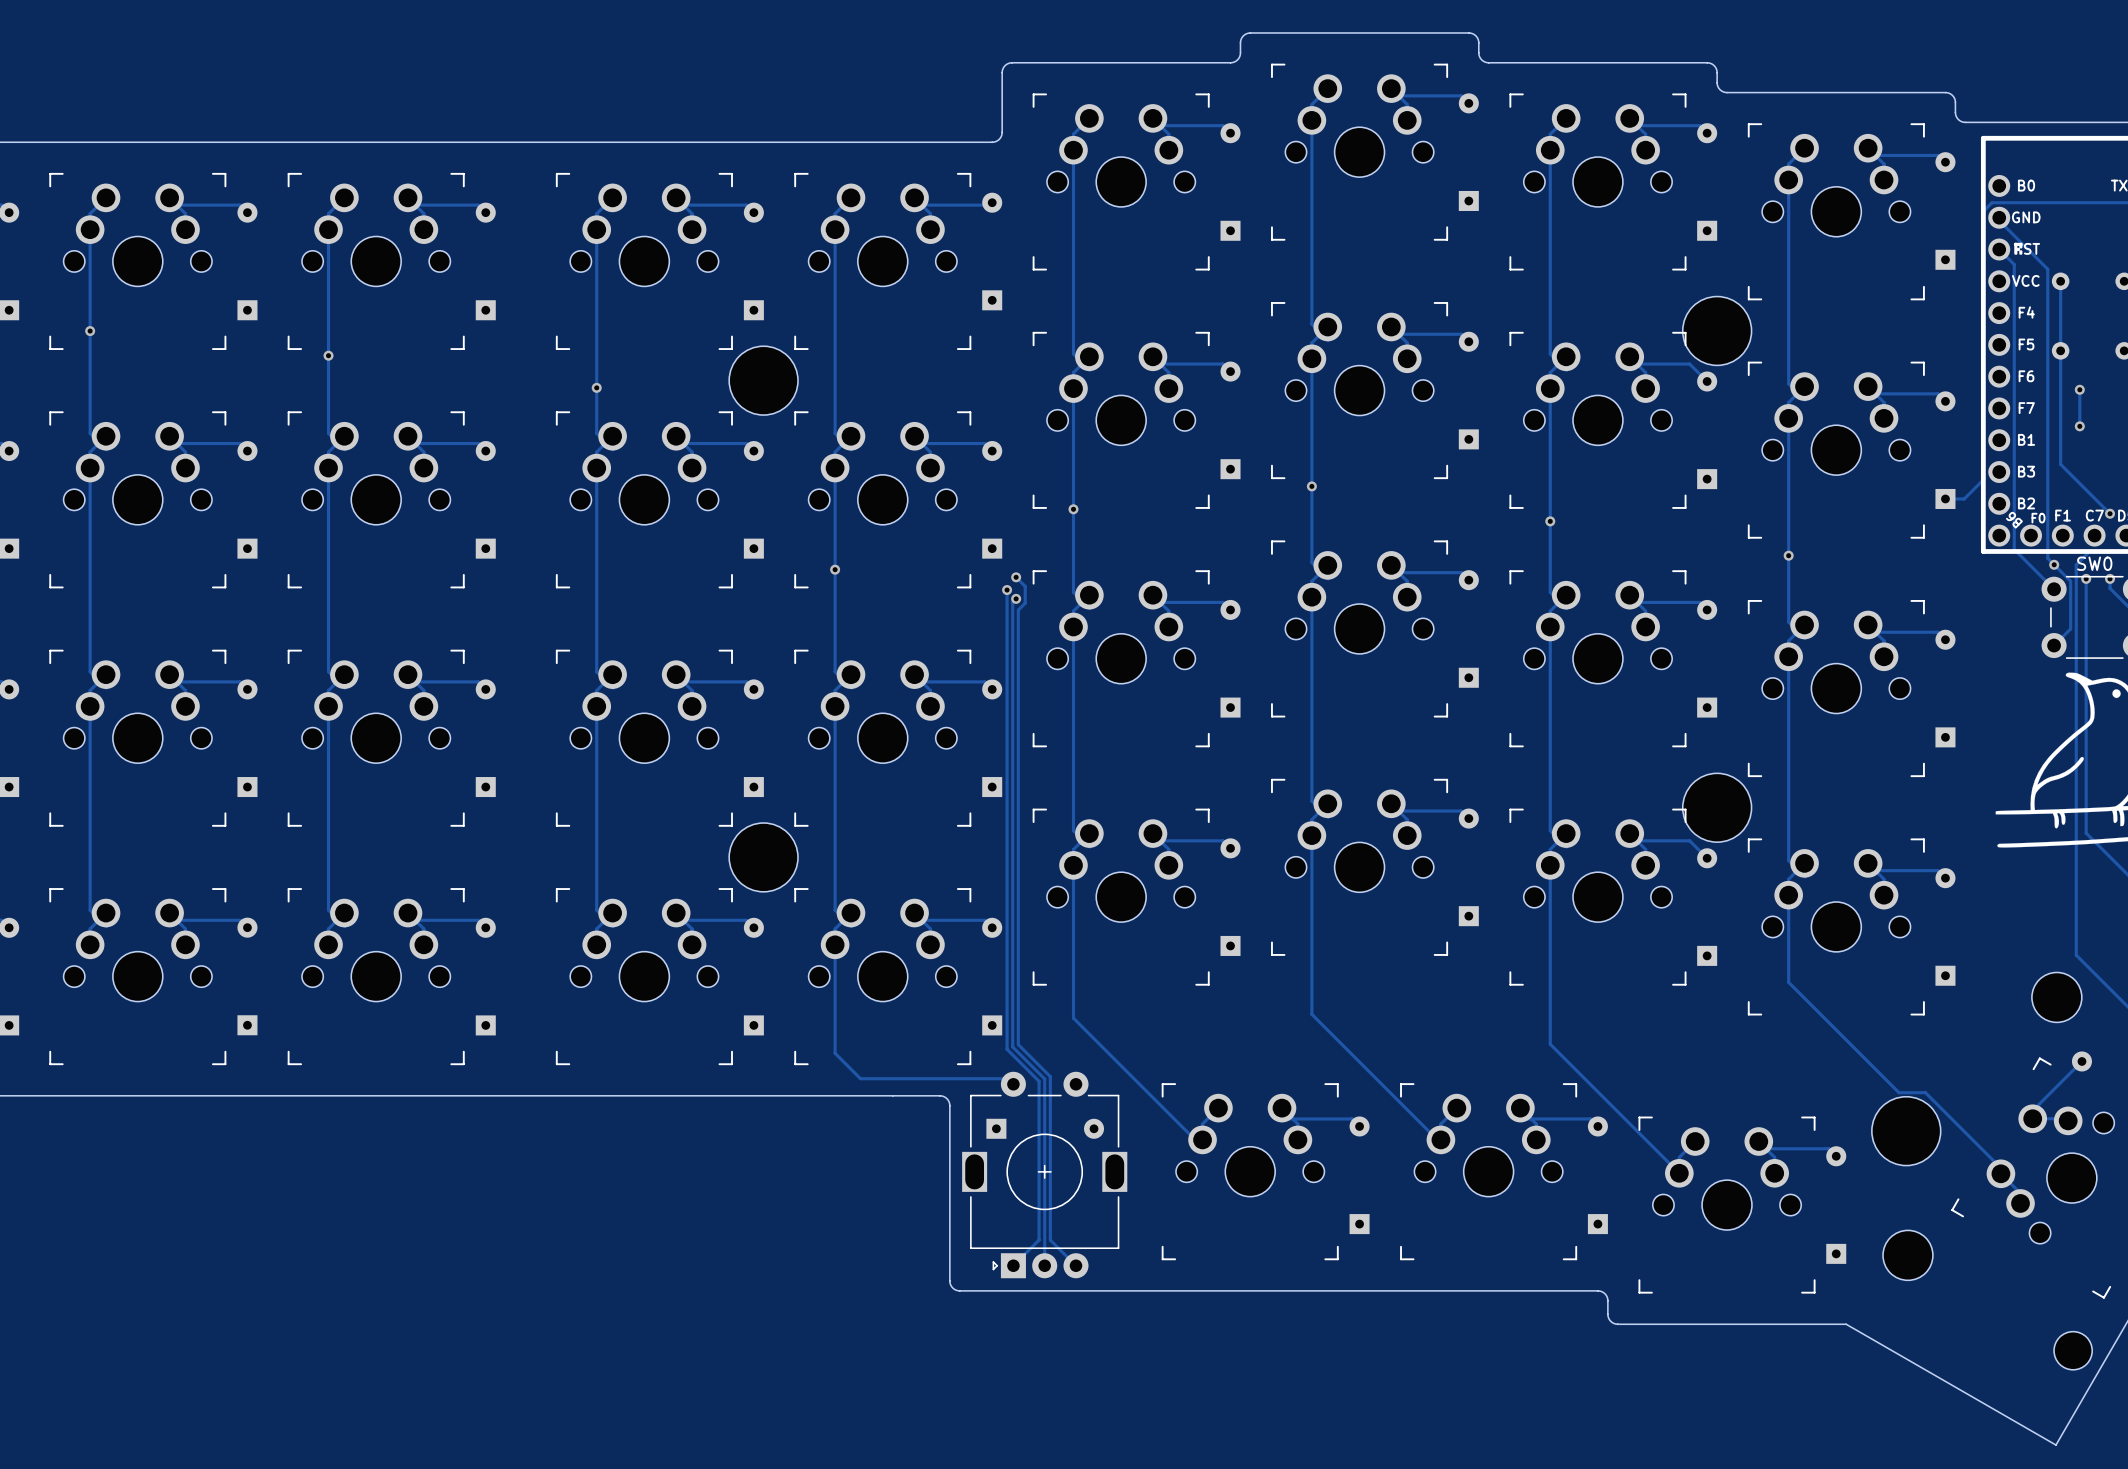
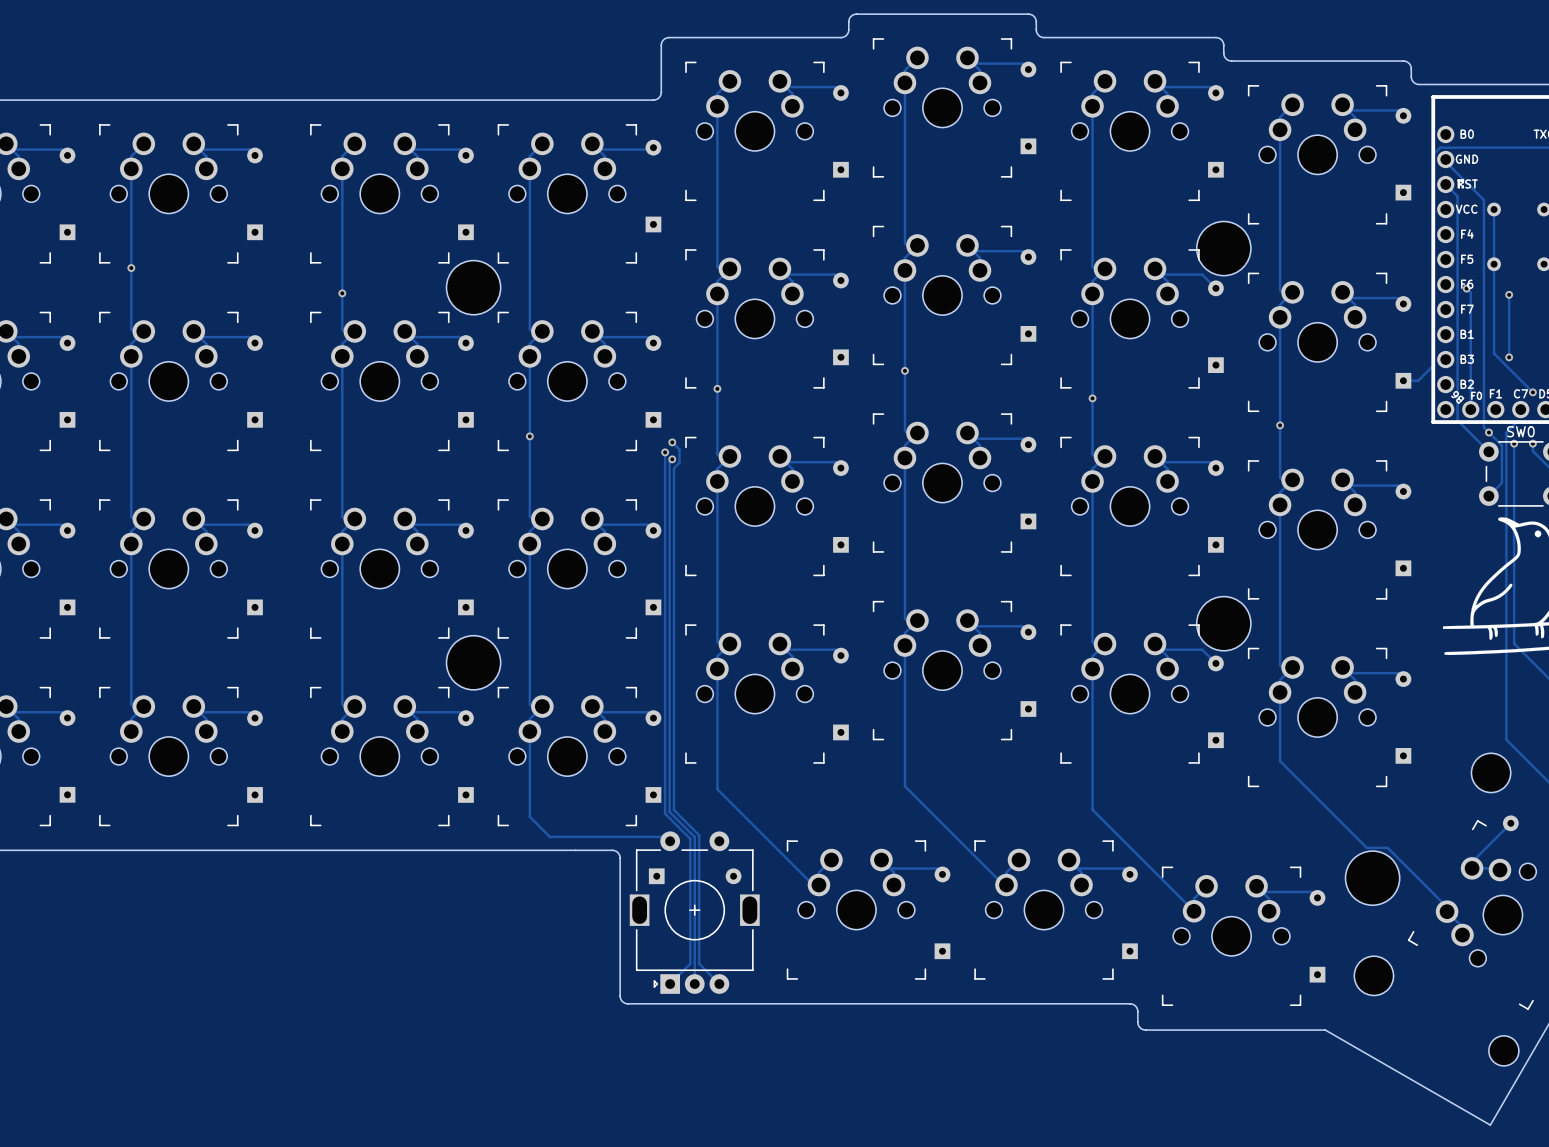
track: none -> (1466, 288) (1470, 292) (1470, 409)
via: none -> (1466, 288)
track: none -> (1509, 323) (1509, 357)
via: (2079, 426) -> none
via: none -> (1509, 357)

